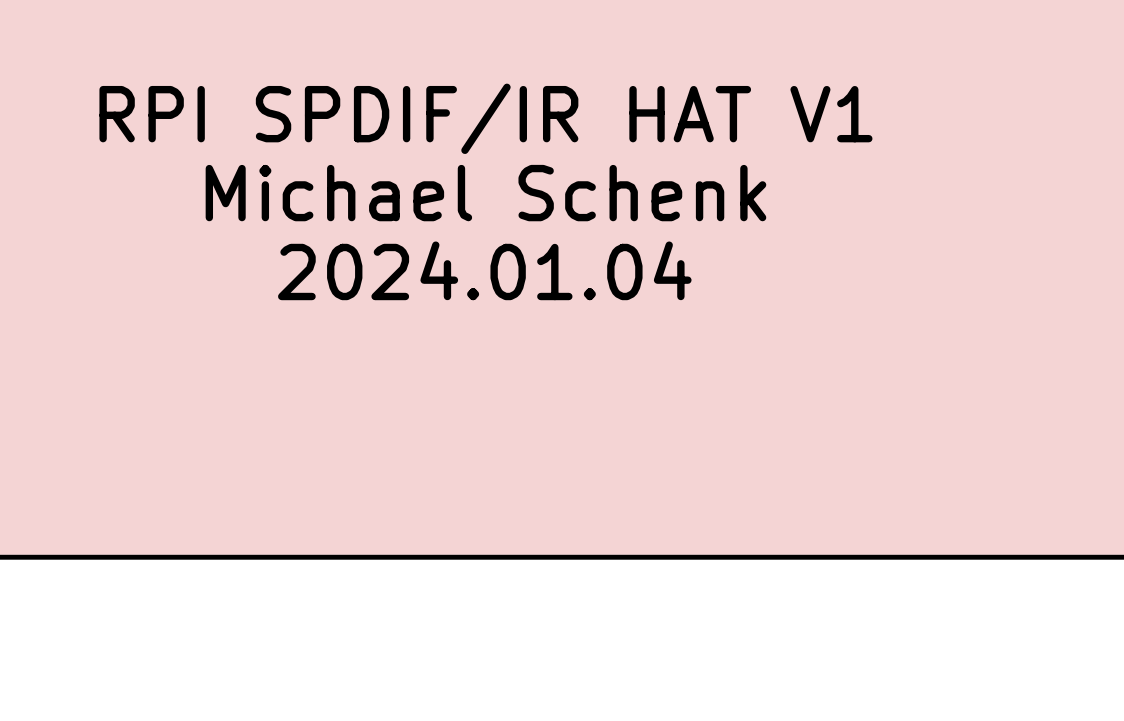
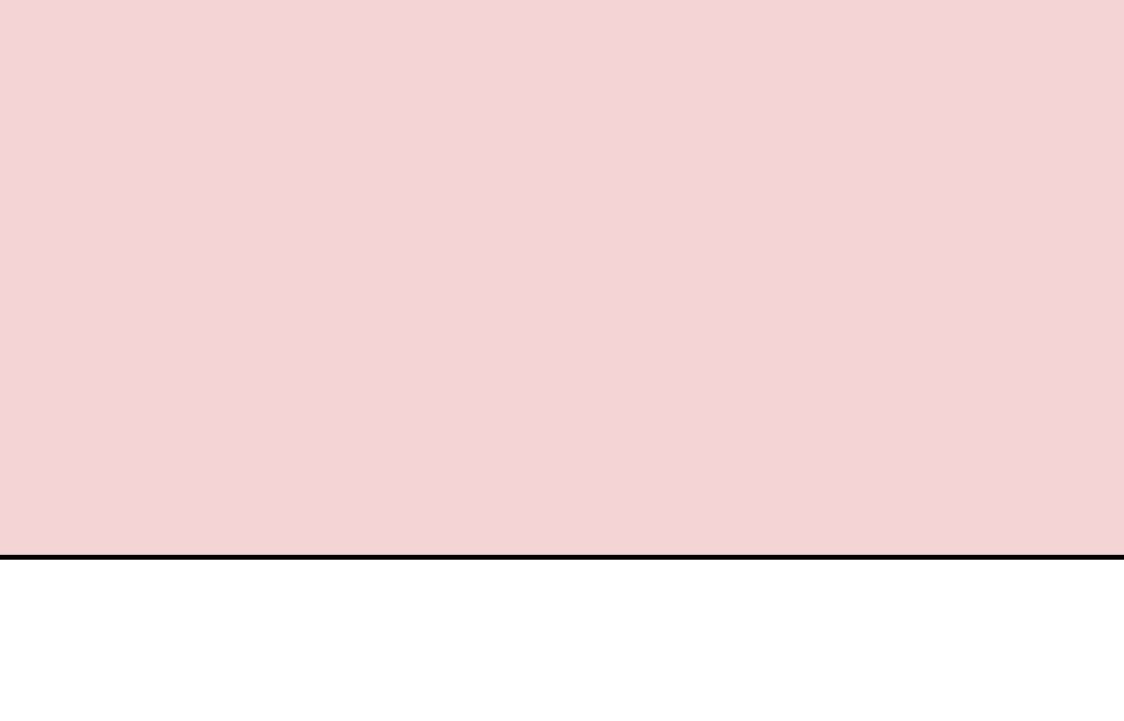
text: RPI SPDIF/IR HAT V1 (485, 118) -> none
text: Michael Schenk (485, 193) -> none
text: 2024.01.04 (484, 270) -> none

